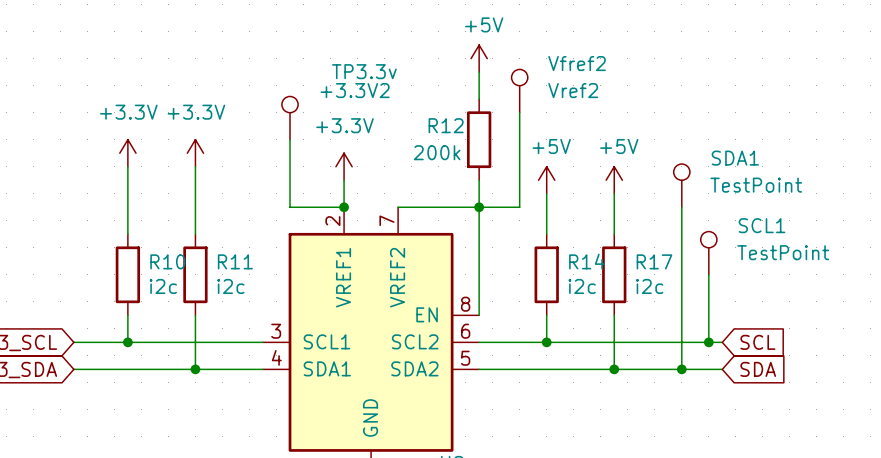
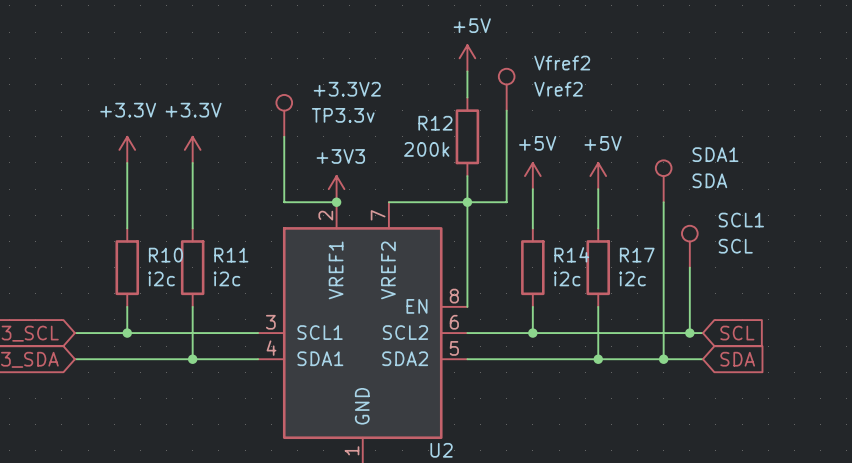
+3.3V2 value position: TP3.3v (364, 71) -> TP3.3v (343, 115)
power symbol: +3.3V (344, 166) -> none
SDA1 value: TestPoint (756, 185) -> SDA (709, 180)
power symbol: none -> +3V3 (336, 189)
SCL1 value: TestPoint (783, 252) -> SCL (735, 246)

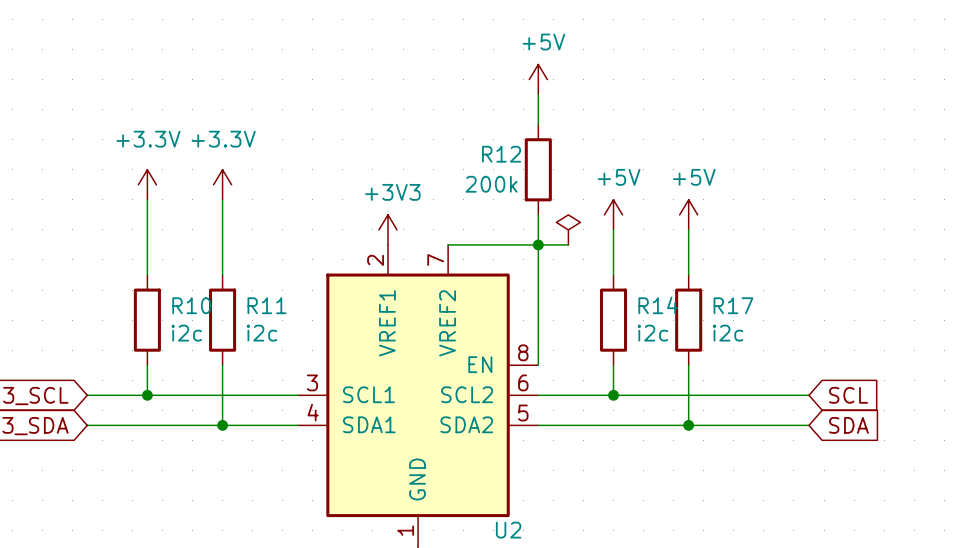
Vfref2: Vref2 (506, 89) -> none
wire: (506, 110) (506, 202) (493, 202) -> none
+3.3V2: TP3.3v (284, 115) -> none
wire: (284, 136) (284, 202) (336, 202) -> none
SDA1: SDA (663, 181) -> none
power symbol: none -> (568, 229)
junction: (336, 202) -> none
wire: (663, 202) (663, 359) -> none
SCL1: SCL (689, 246) -> none
wire: (689, 267) (689, 333) -> none
junction: (689, 333) -> none
junction: (663, 359) -> none

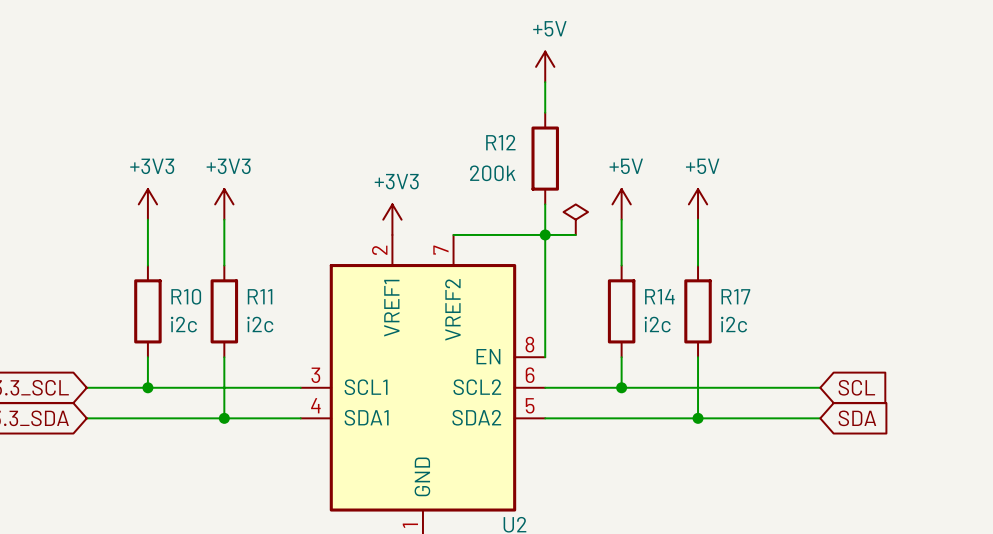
power symbol: +3.3V (147, 184) -> none
power symbol: +3.3V (222, 184) -> none
power symbol: none -> +3V3 (147, 204)
power symbol: none -> +3V3 (224, 204)

